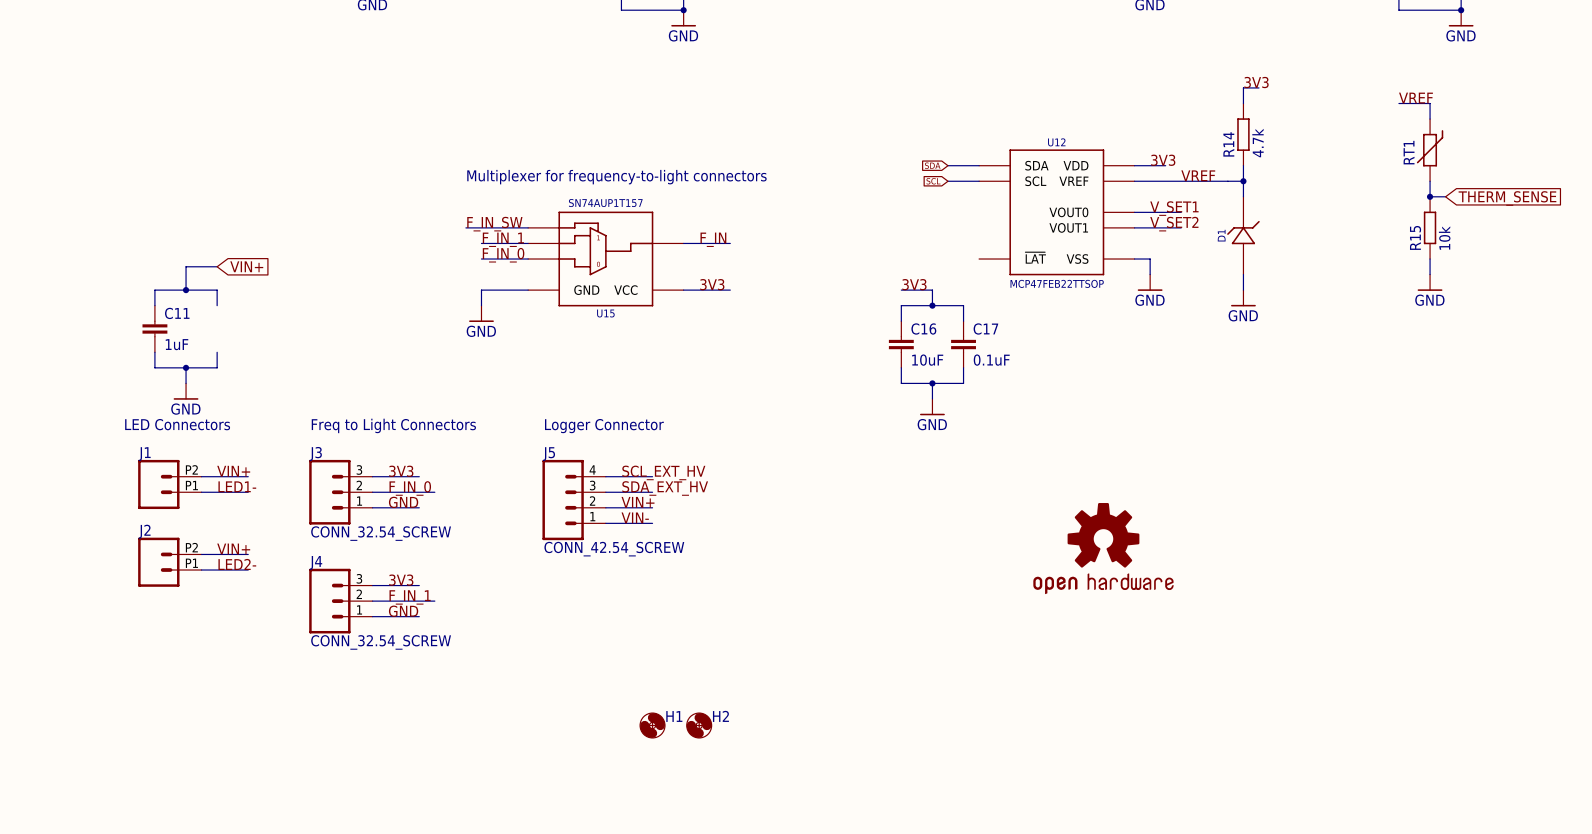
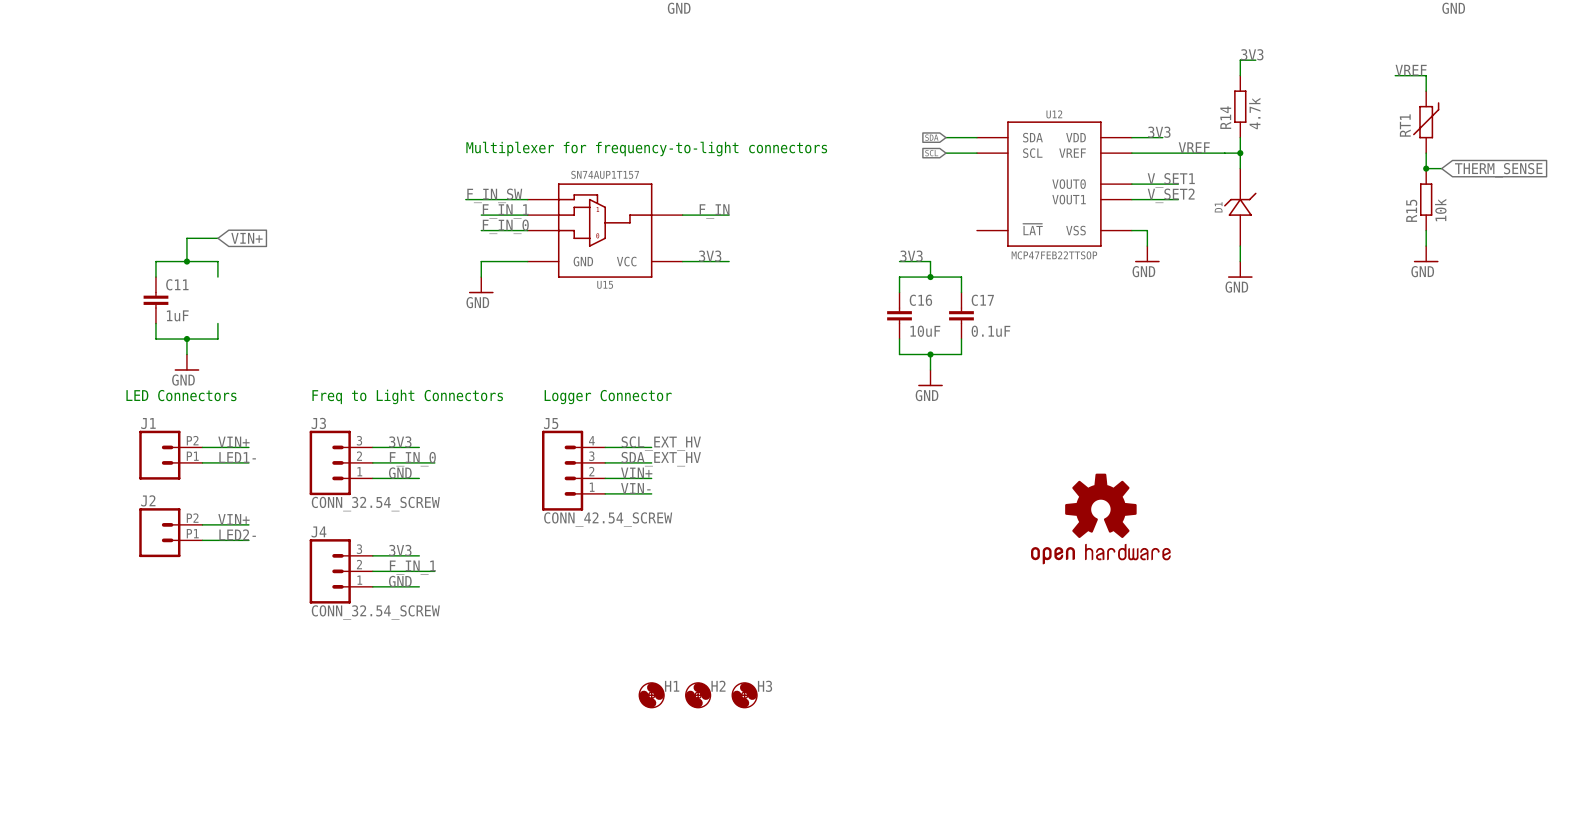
H3: none -> (744, 695)

